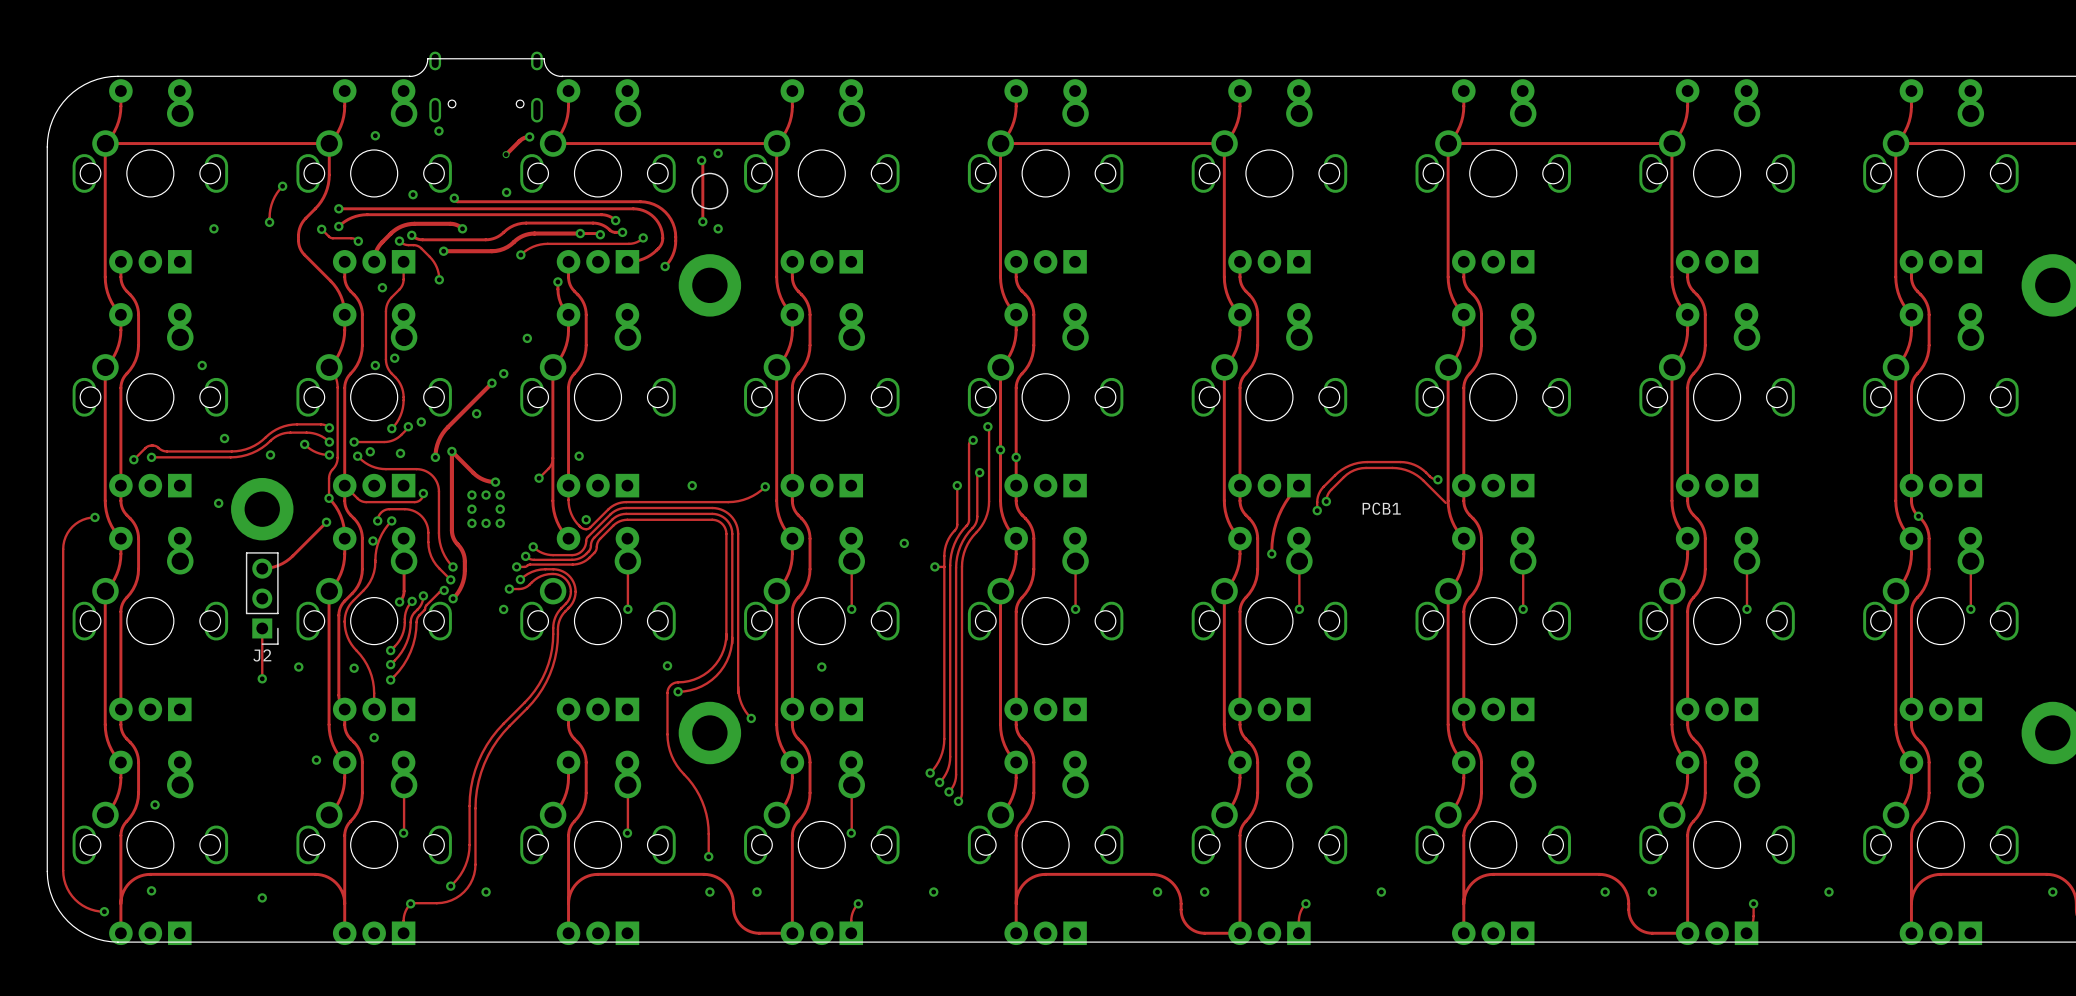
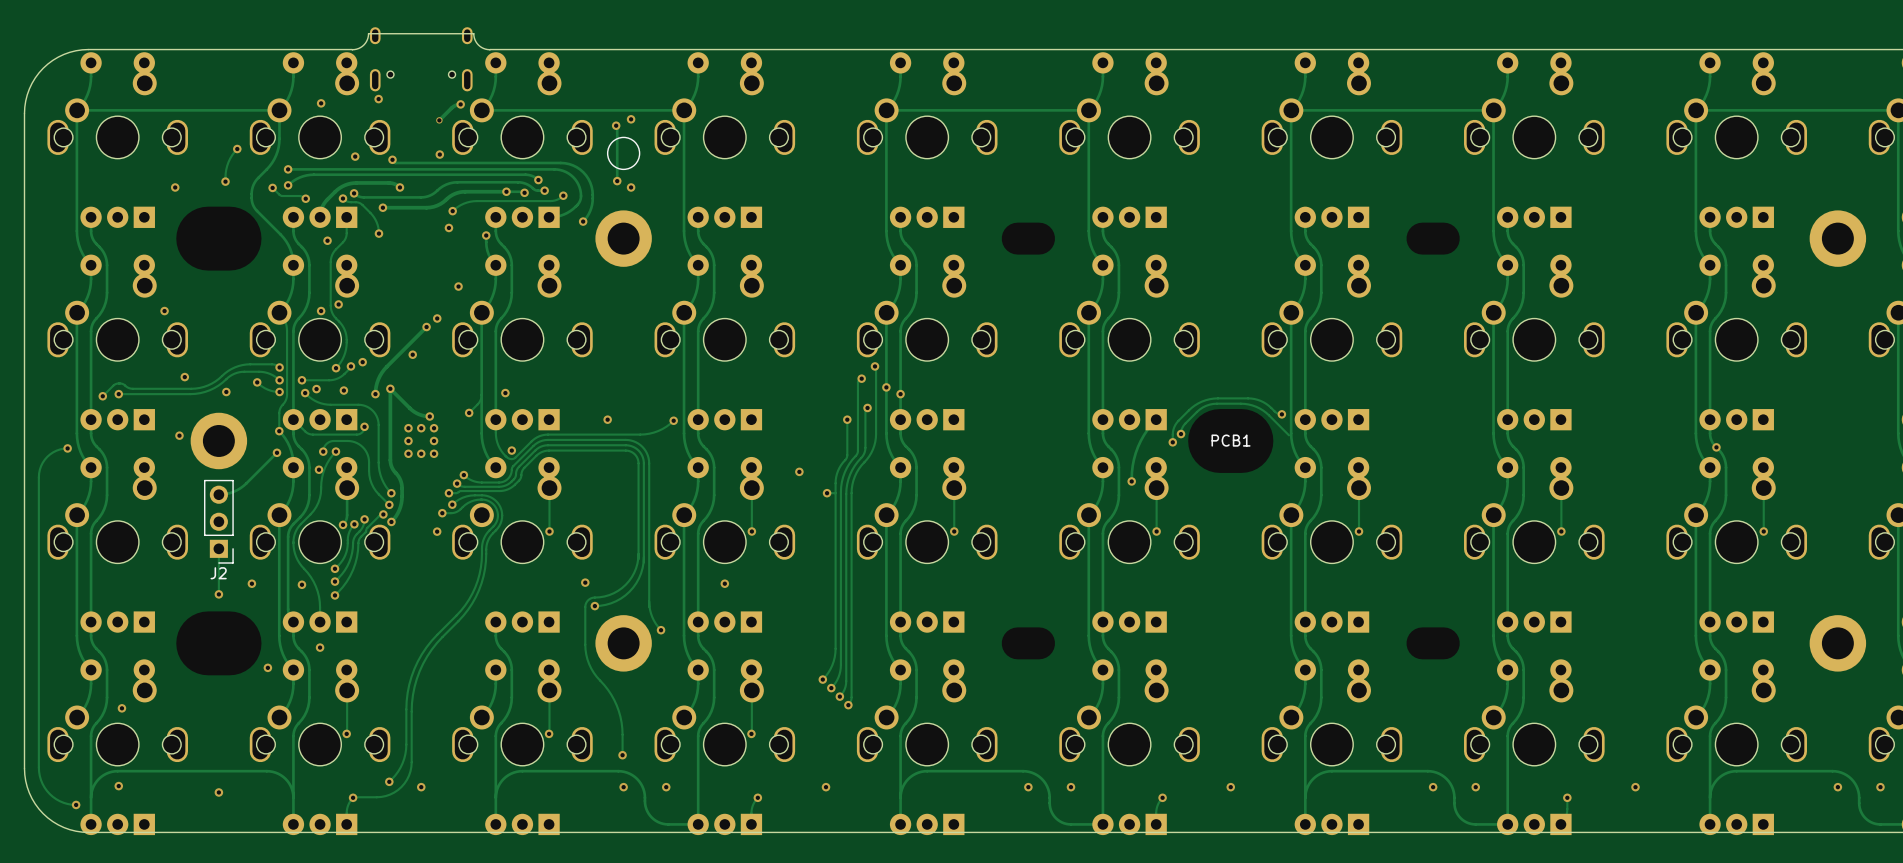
via: none -> (448, 227)

